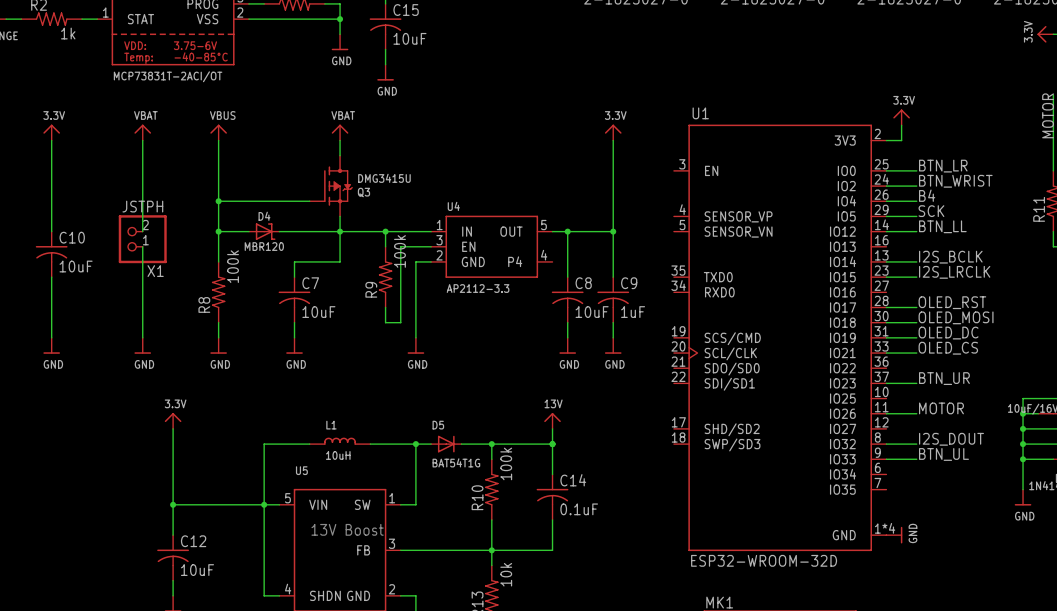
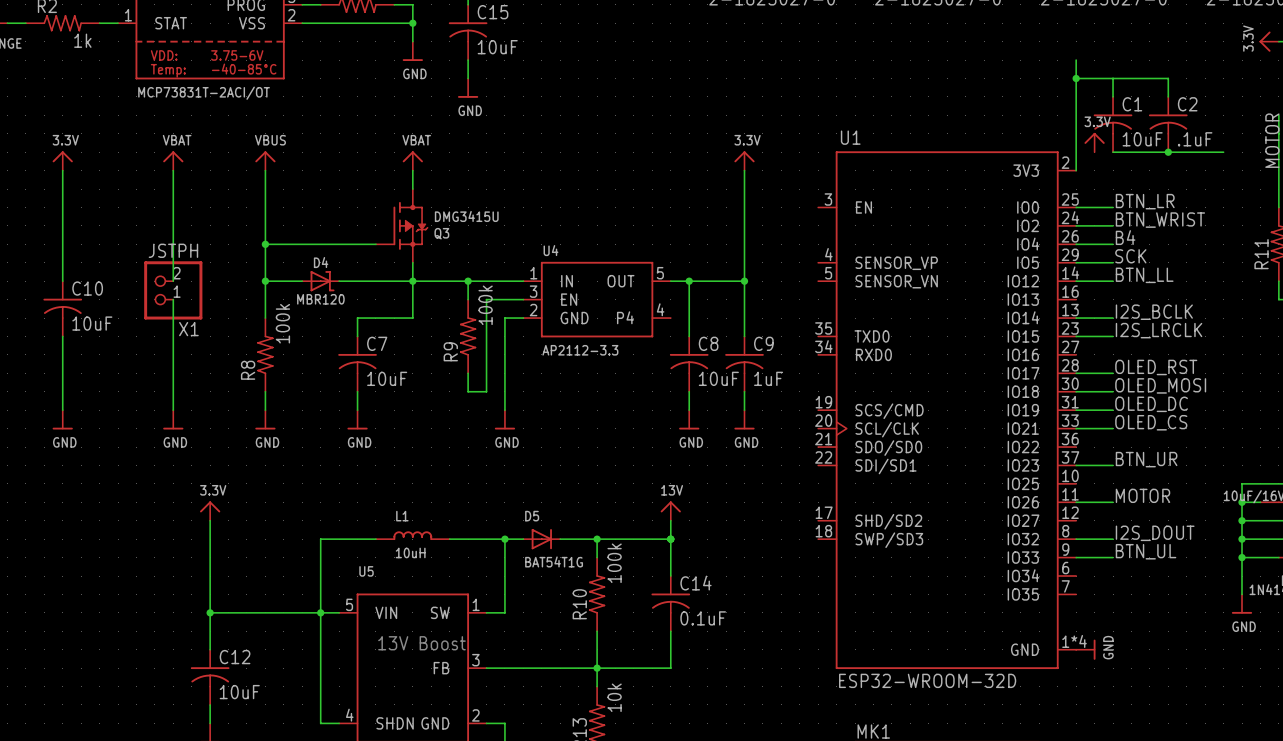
wire: none -> (1076, 78) (1168, 78) (1168, 96)
junction: none -> (1076, 78)
wire: none -> (1113, 78) (1113, 96)
C1: none -> 10uF (1113, 124)
C2: none -> .1uF (1168, 124)
wire: (901, 125) (901, 140) (886, 140) -> (1076, 60) (1076, 170)
wire: none -> (1113, 152) (1223, 152)
junction: none -> (1168, 152)

